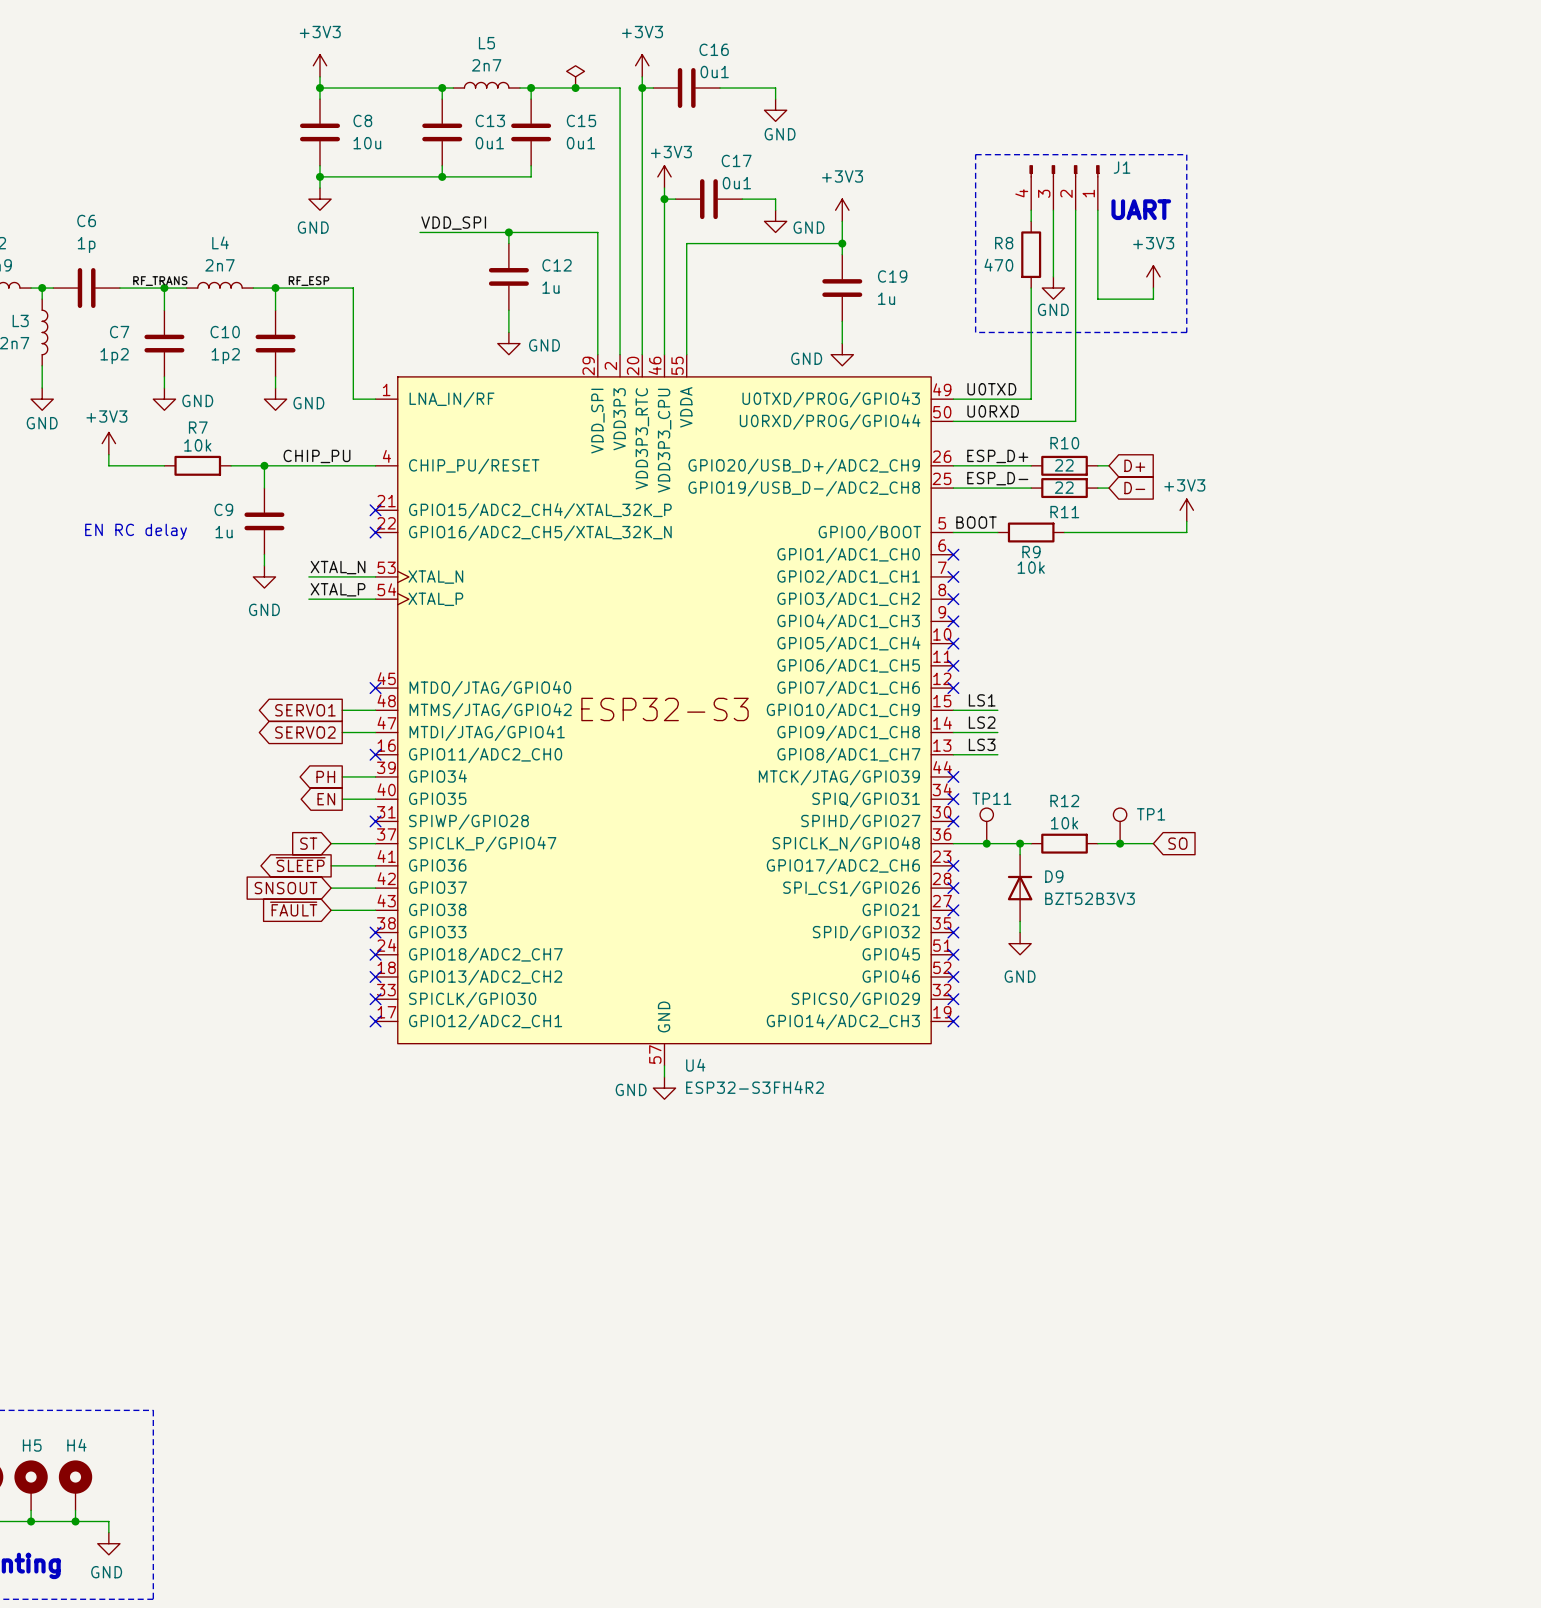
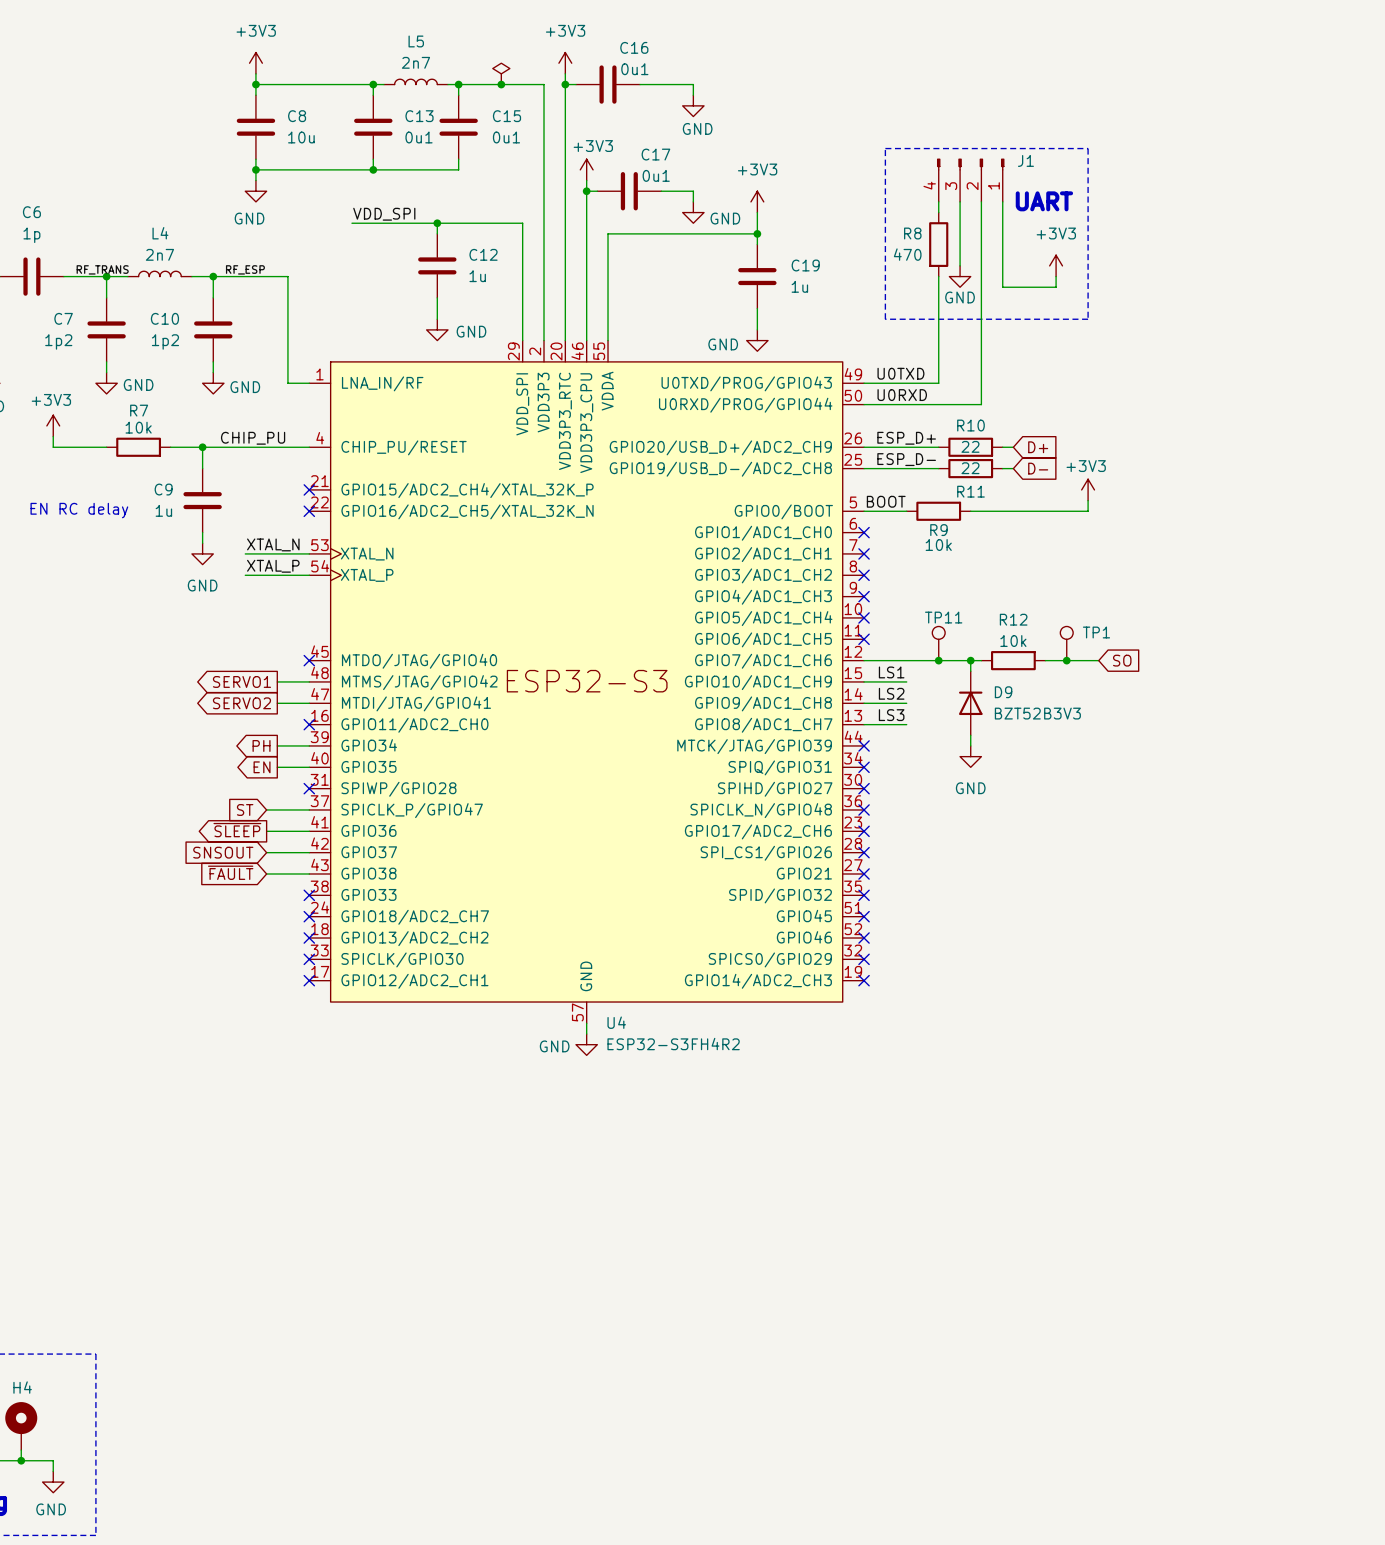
wire: none -> (864, 660) (981, 660)
no-connect mark: (953, 688) -> none
junction: none -> (938, 660)
junction: none -> (970, 660)
junction: none -> (1066, 660)
TP11 position: (986, 825) -> (938, 643)
TP1 position: (1120, 825) -> (1066, 643)
wire: (953, 843) (1031, 843) -> none
no-connect mark: none -> (864, 809)
junction: (986, 843) -> none
wire: (1020, 843) (1020, 854) -> (970, 660) (970, 671)
junction: (1020, 843) -> none
R12 position: (1064, 843) -> (1013, 660)
wire: (1097, 843) (1153, 843) -> (1045, 660) (1098, 660)
junction: (1120, 843) -> none
global label position: SO (1177, 843) -> SO (1122, 660)
D9 position: (1020, 888) -> (970, 703)
wire: (1020, 921) (1020, 932) -> (970, 735) (970, 745)
power symbol position: GND (1020, 943) -> GND (970, 756)

